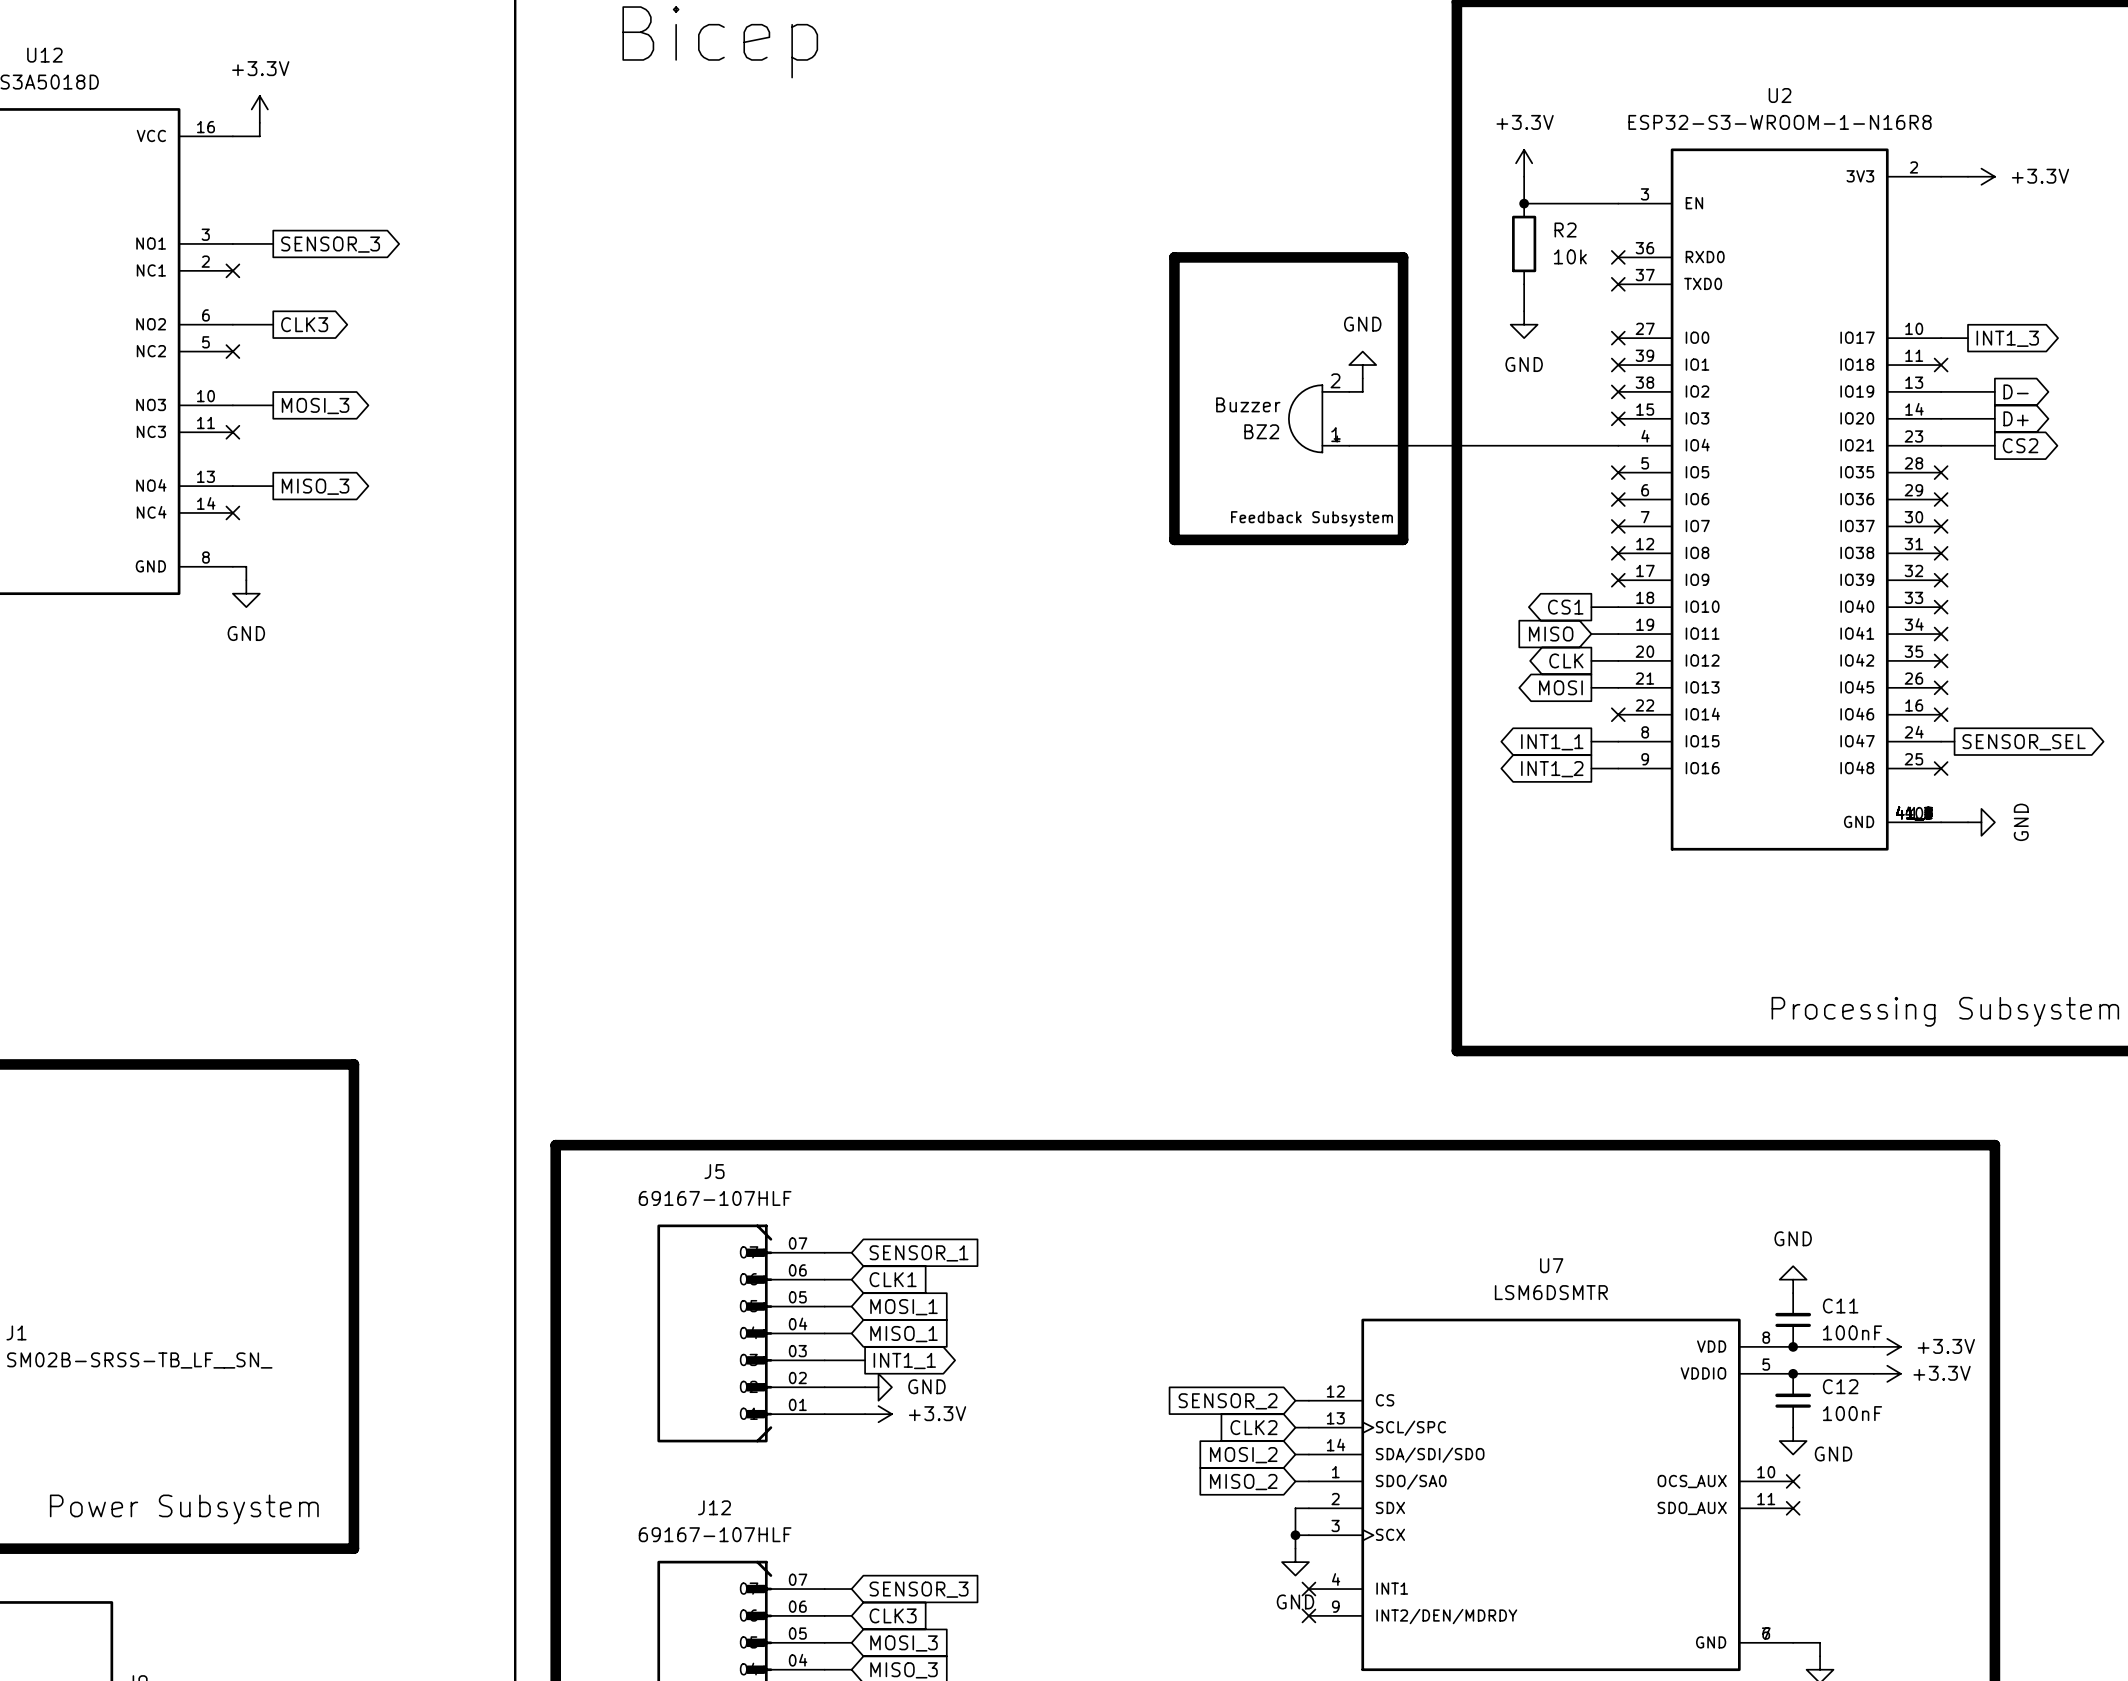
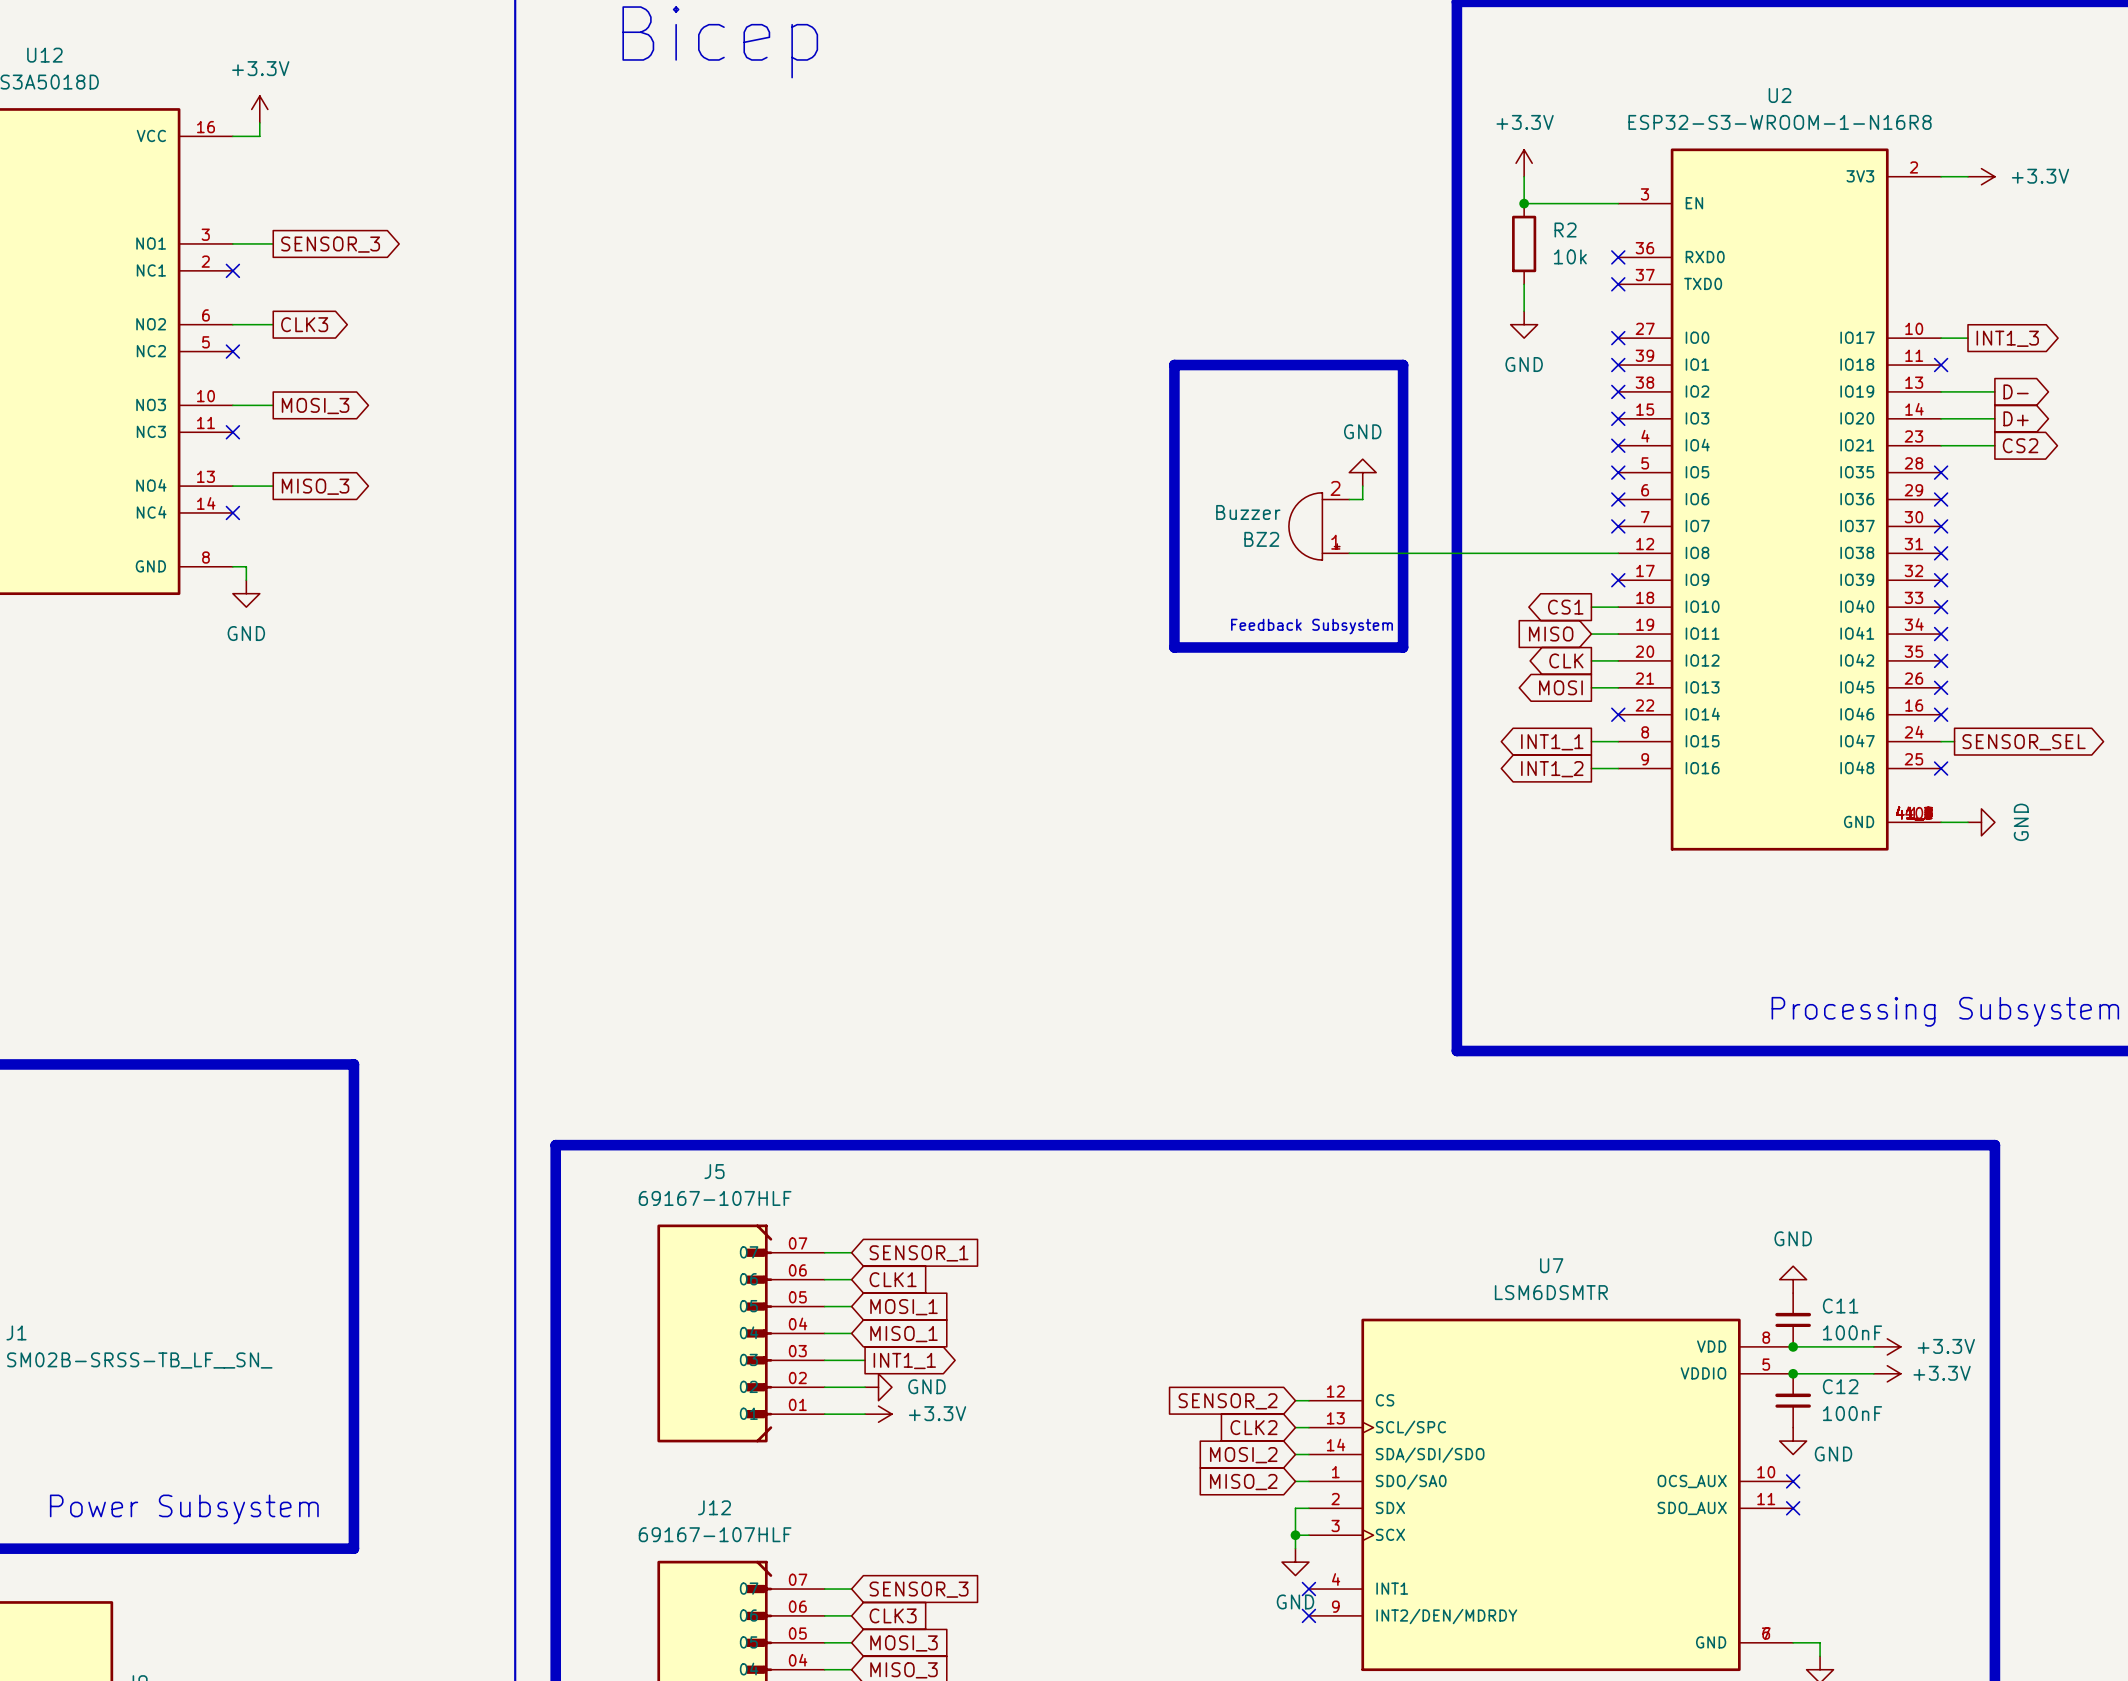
line: (1174, 365) (1174, 257) (1403, 257) (1403, 365) -> (1174, 365) (1403, 365)
power symbol position: GND (1362, 365) -> GND (1362, 472)
wire: (1362, 378) (1362, 391) (1349, 391) -> (1362, 486) (1362, 499) (1349, 499)
BZ2 position: (1319, 418) -> (1319, 526)
wire: (1349, 445) (1618, 445) -> (1349, 553) (1618, 553)
no-connect mark: none -> (1618, 445)
text position: Feedback Subsystem (1312, 518) -> Feedback Subsystem (1312, 626)
line: (1174, 539) (1403, 539) -> (1174, 539) (1174, 647) (1403, 647) (1403, 539)
no-connect mark: (1618, 553) -> none

